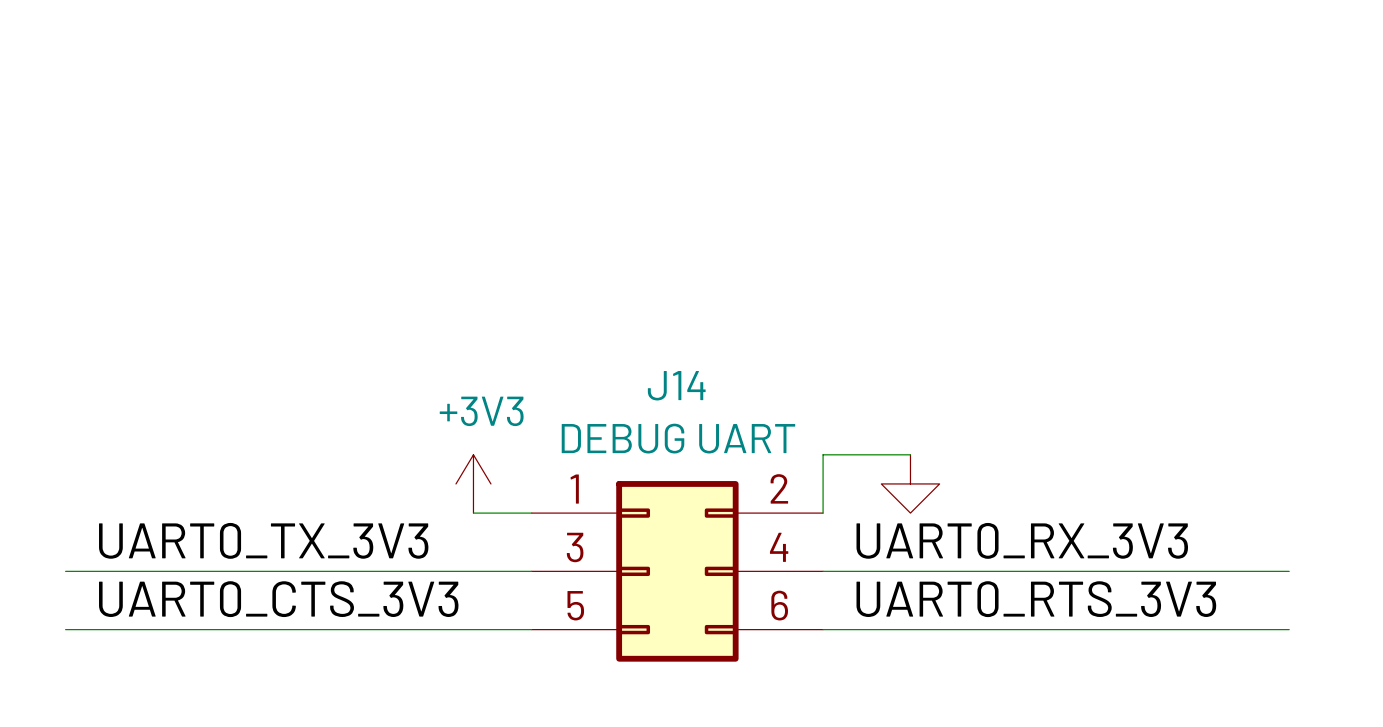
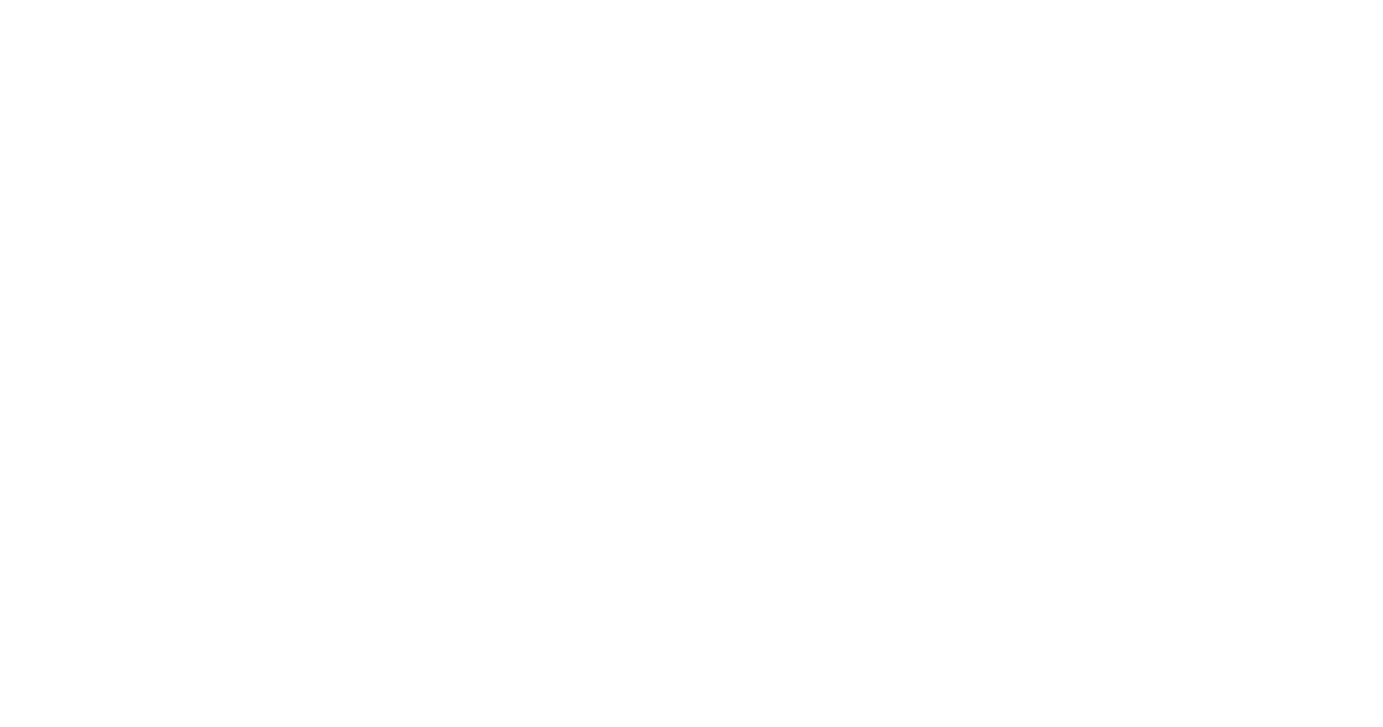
wire: (910, 454) (823, 454) (823, 513) -> none
power symbol: +3V3 (473, 483) -> none
power symbol: (910, 483) -> none
wire: (473, 513) (531, 513) -> none
label: UART0_TX_3V3 (263, 540) -> none
label: UART0_RX_3V3 (1022, 540) -> none
wire: (65, 571) (531, 571) -> none
J14: DEBUG UART (677, 571) -> none
wire: (823, 571) (1289, 571) -> none
label: UART0_CTS_3V3 (278, 599) -> none
label: UART0_RTS_3V3 (1036, 599) -> none
wire: (65, 629) (531, 629) -> none
wire: (823, 629) (1289, 629) -> none

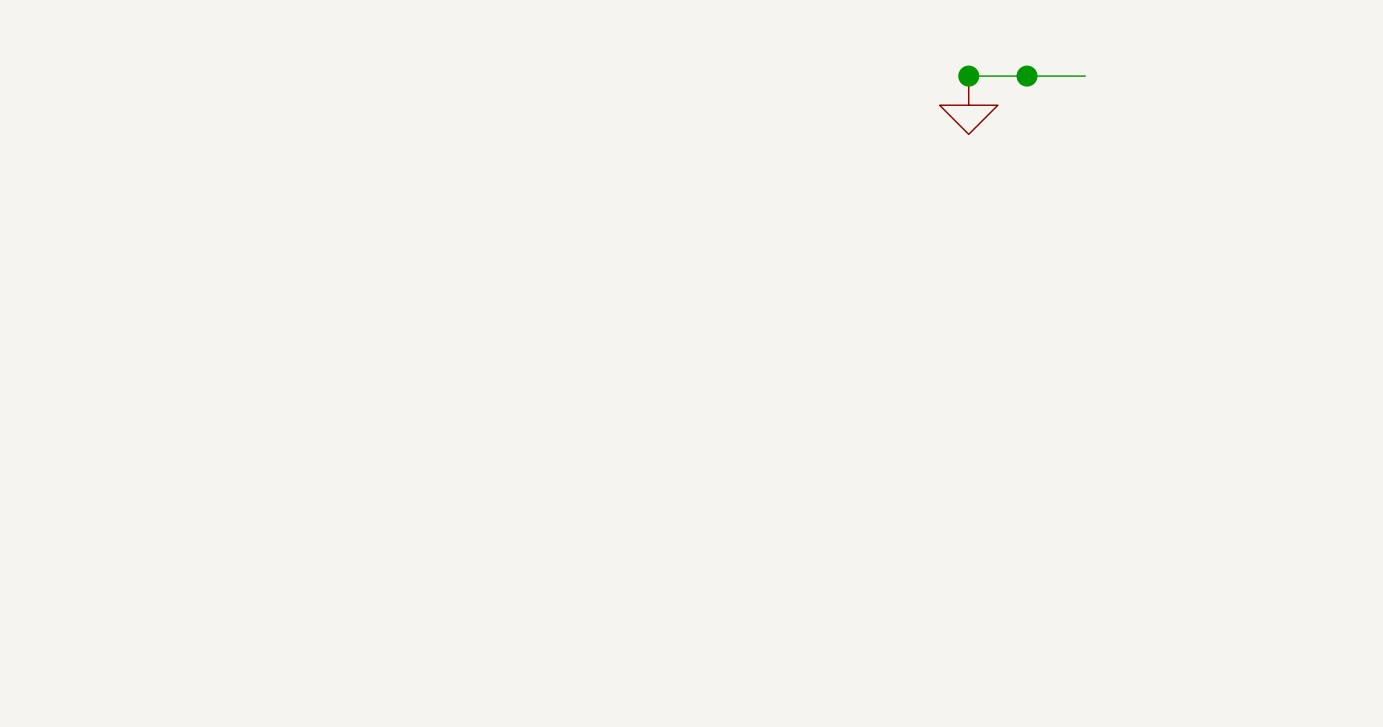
wire: none -> (968, 76) (1085, 76)
junction: none -> (968, 76)
junction: none -> (1027, 76)
power symbol: none -> (968, 105)

